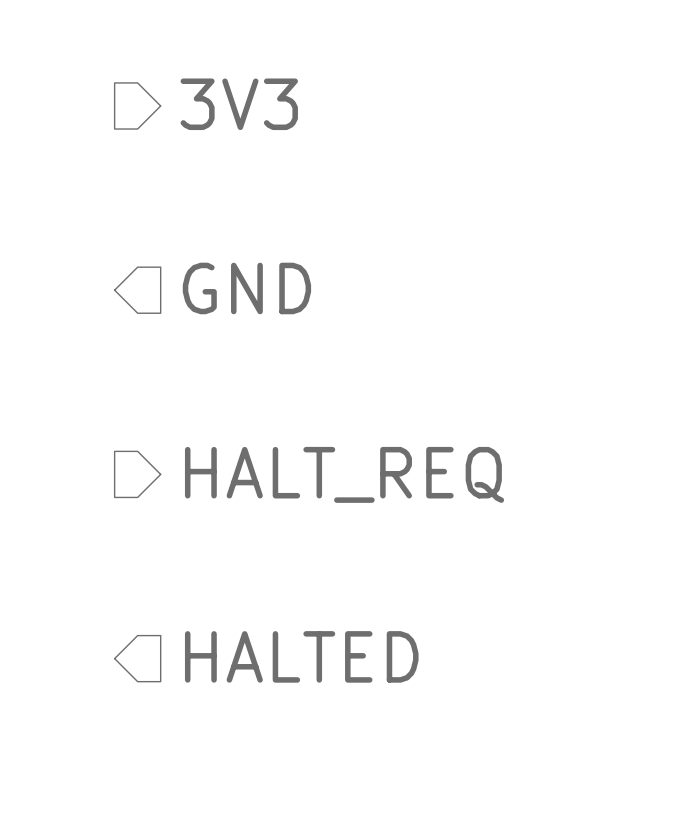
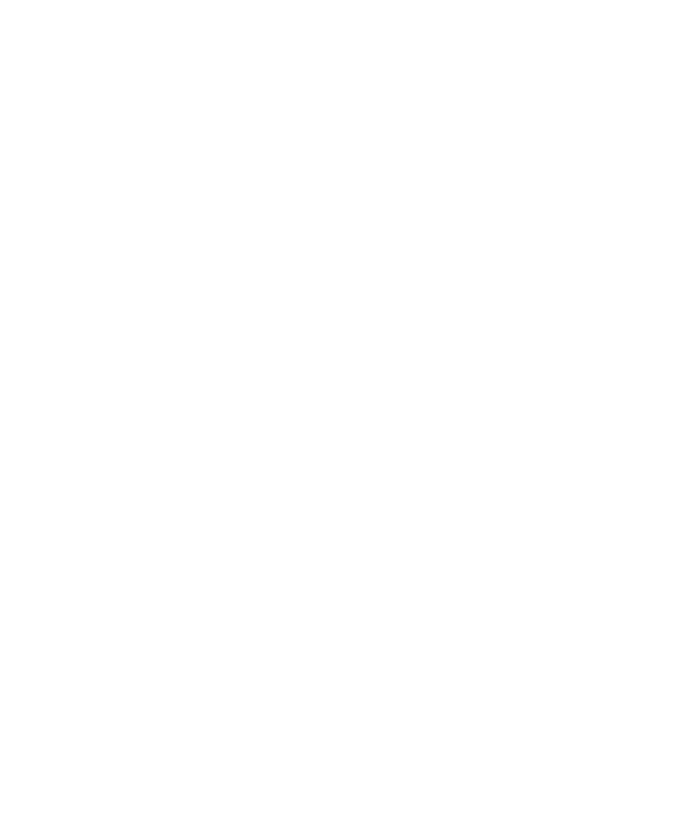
hierarchical label: 3V3 (239, 104) -> none
hierarchical label: GND (246, 288) -> none
hierarchical label: HALT_REQ (344, 474) -> none
hierarchical label: HALTED (301, 656) -> none

